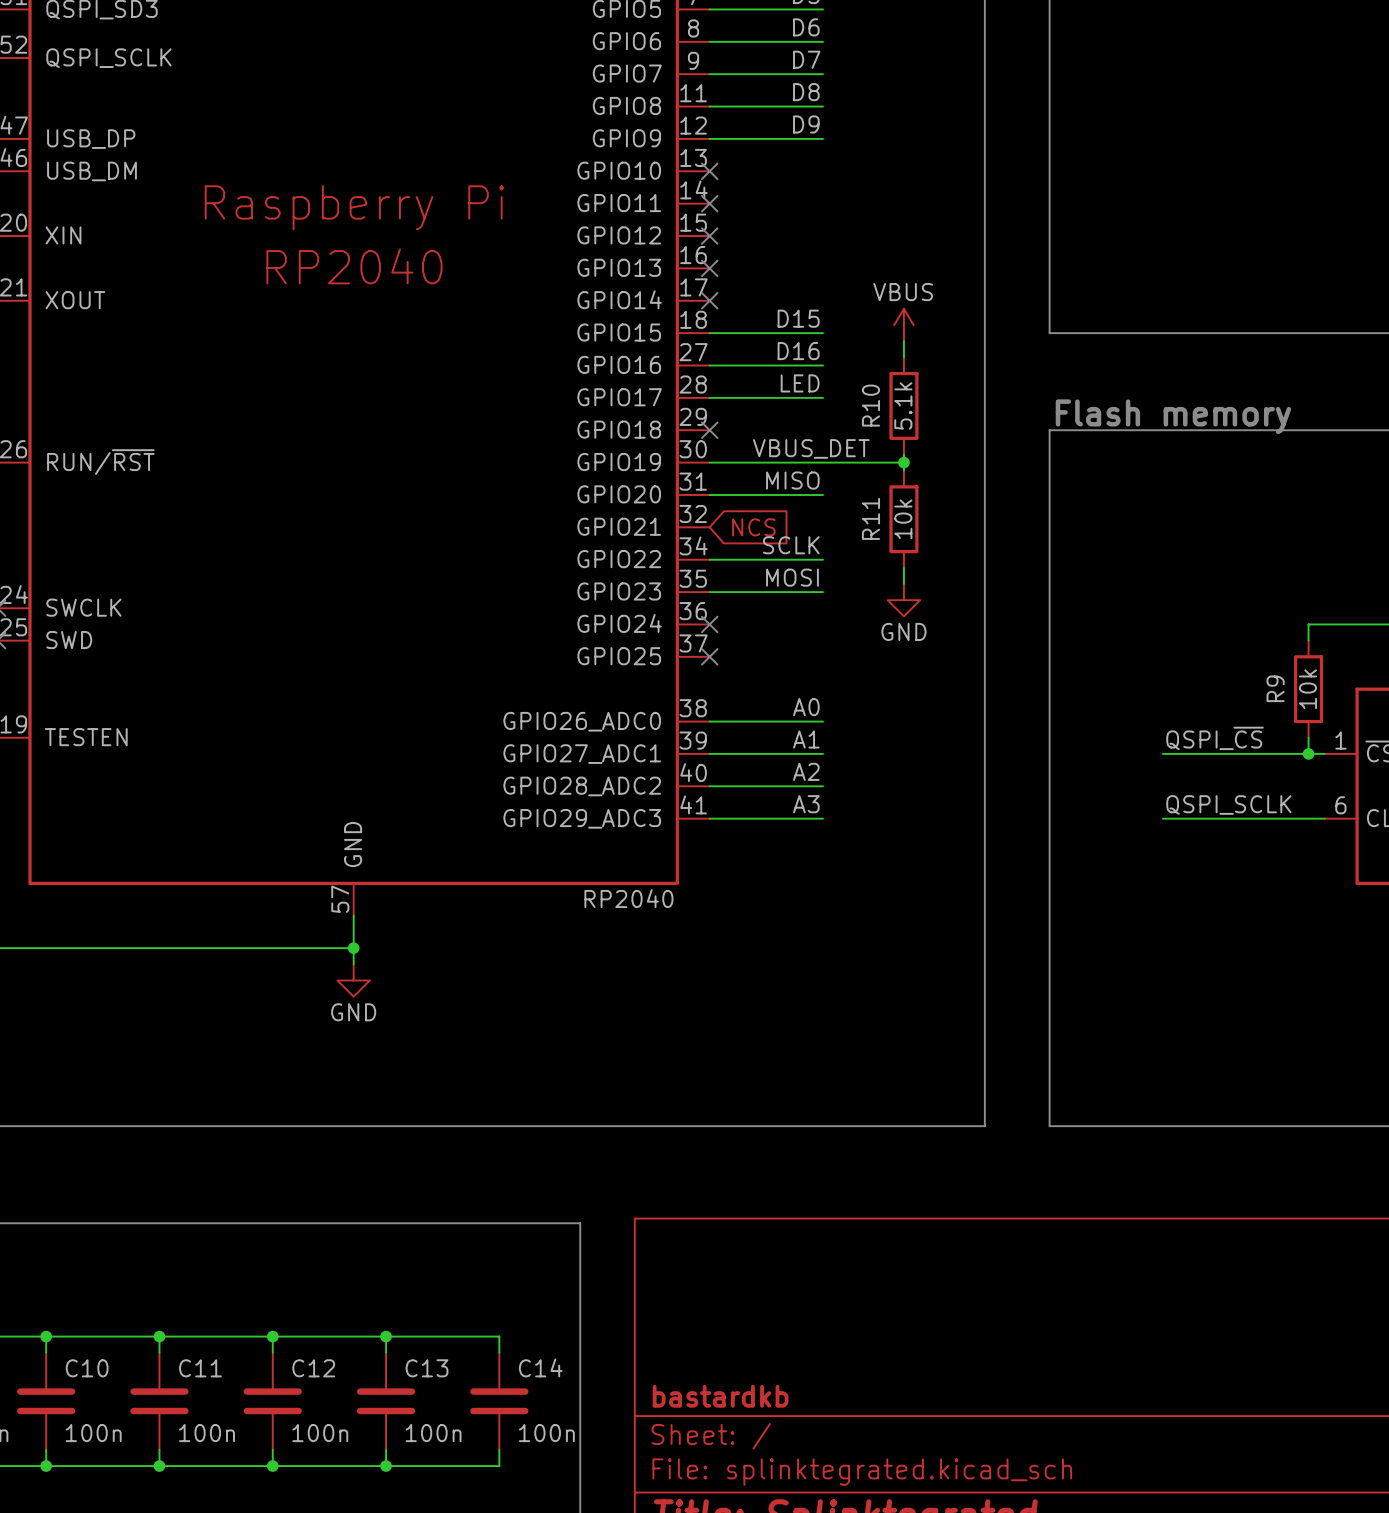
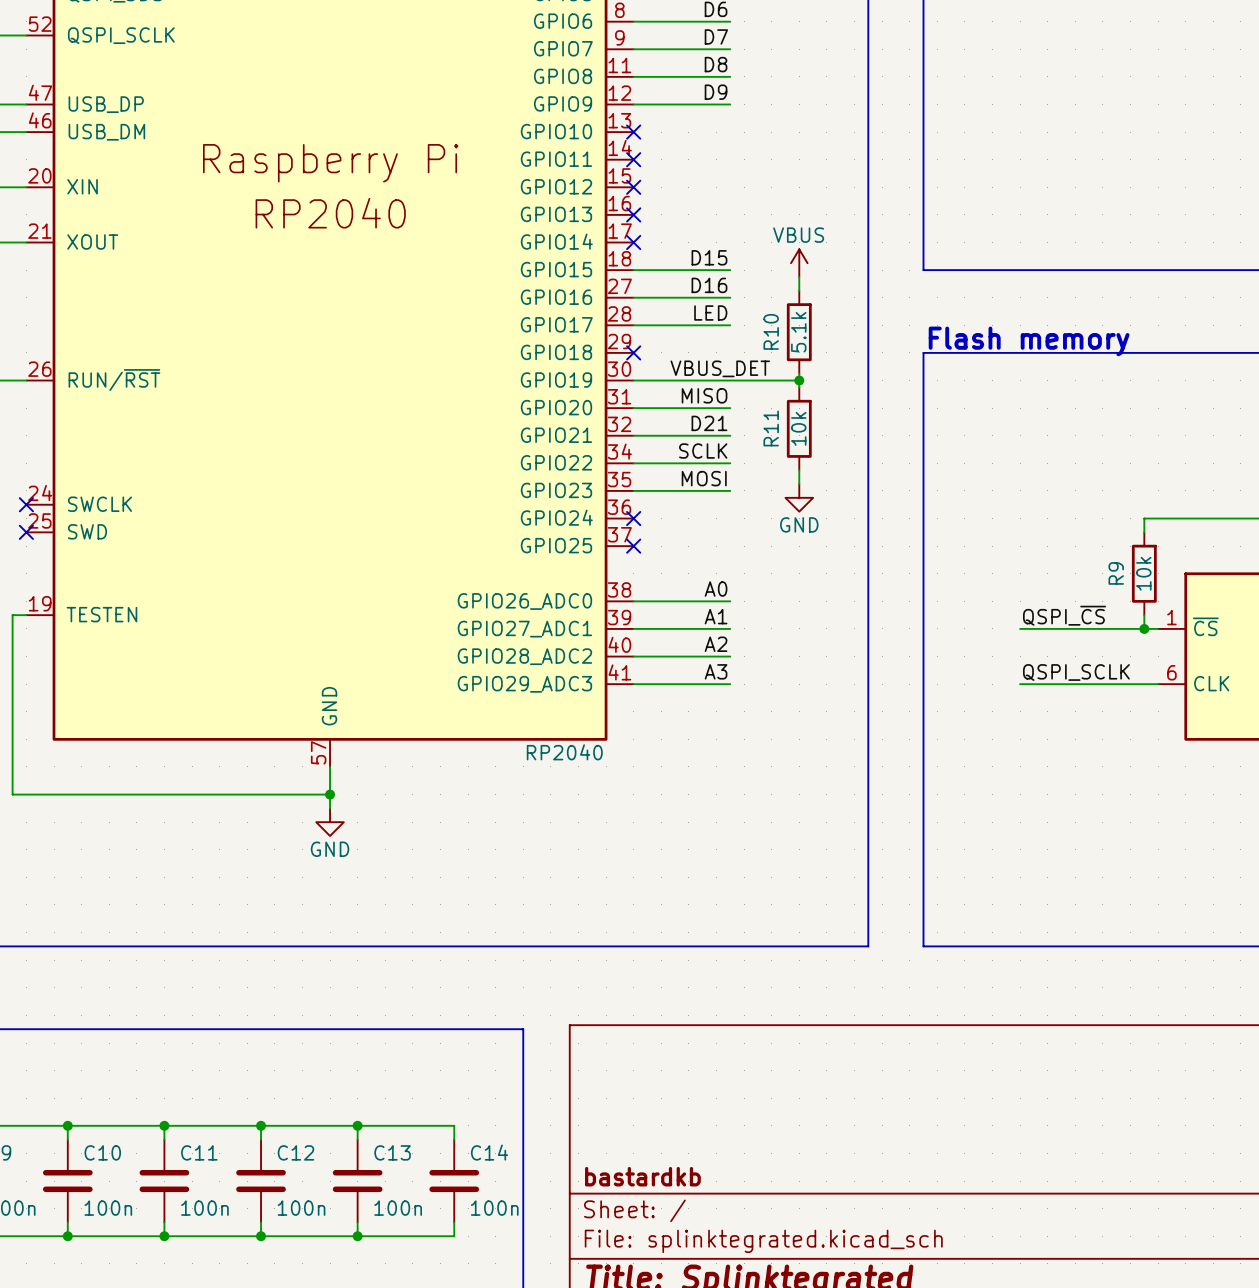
label: none -> D21 (709, 423)
wire: none -> (633, 435) (730, 435)
global label: NCS (753, 527) -> none

